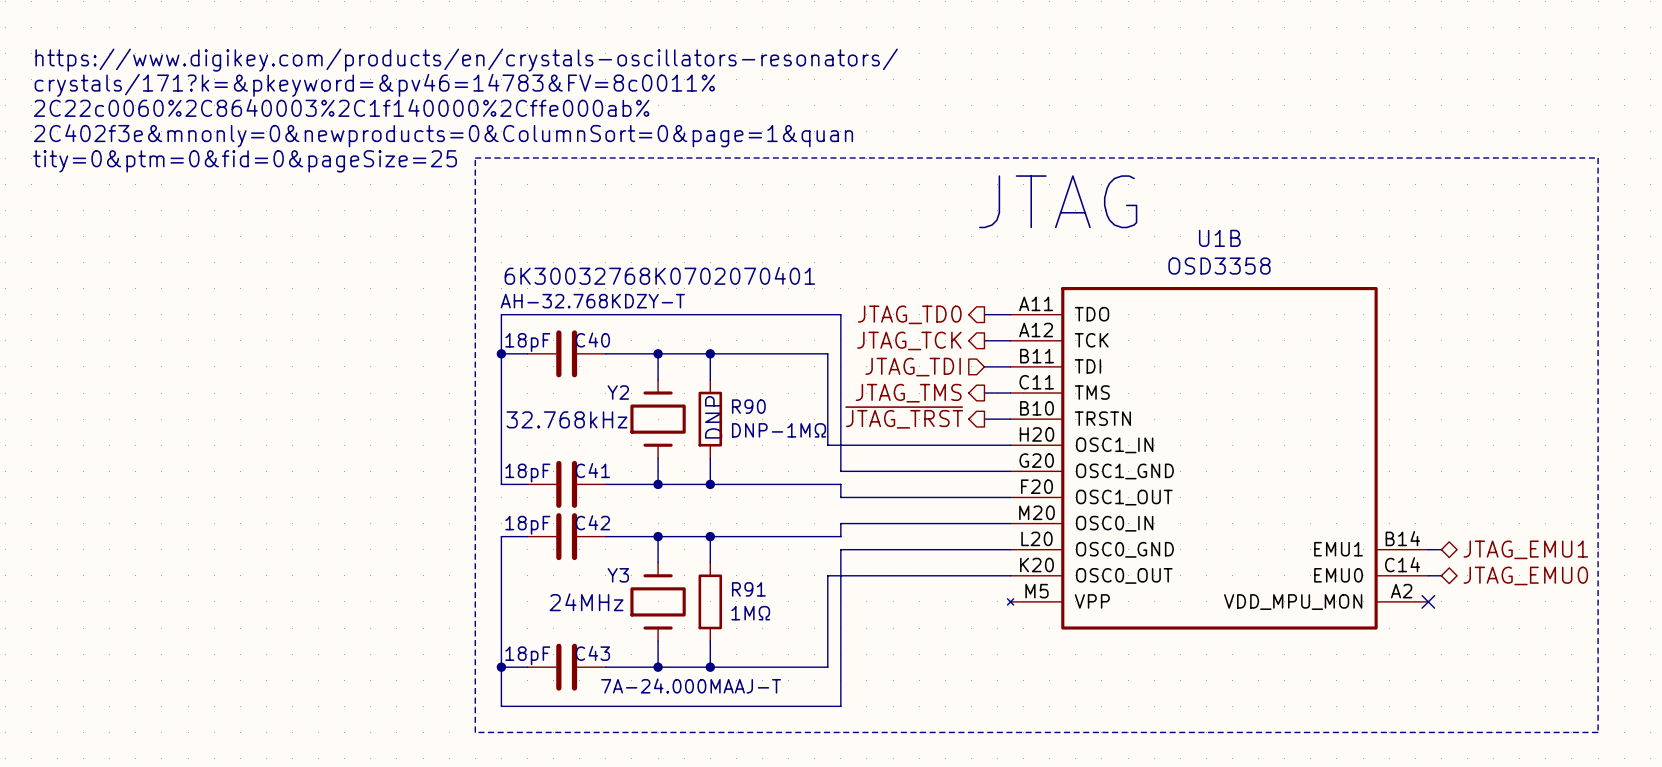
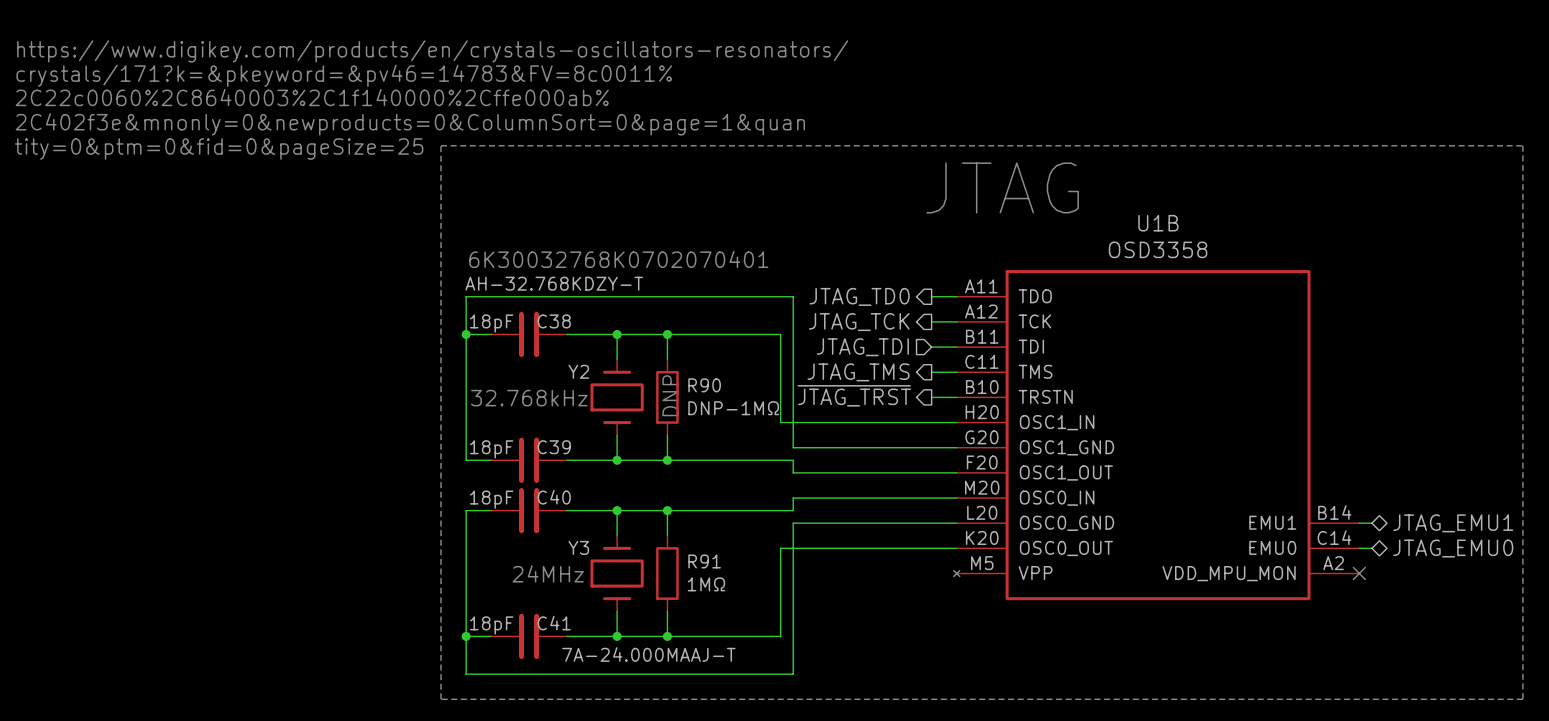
C40 name: C40 (592, 339) -> C38 (554, 321)
C41 name: C41 (592, 470) -> C39 (554, 447)
C42 name: C42 (592, 522) -> C40 (554, 497)
C43 name: C43 (592, 653) -> C41 (554, 623)

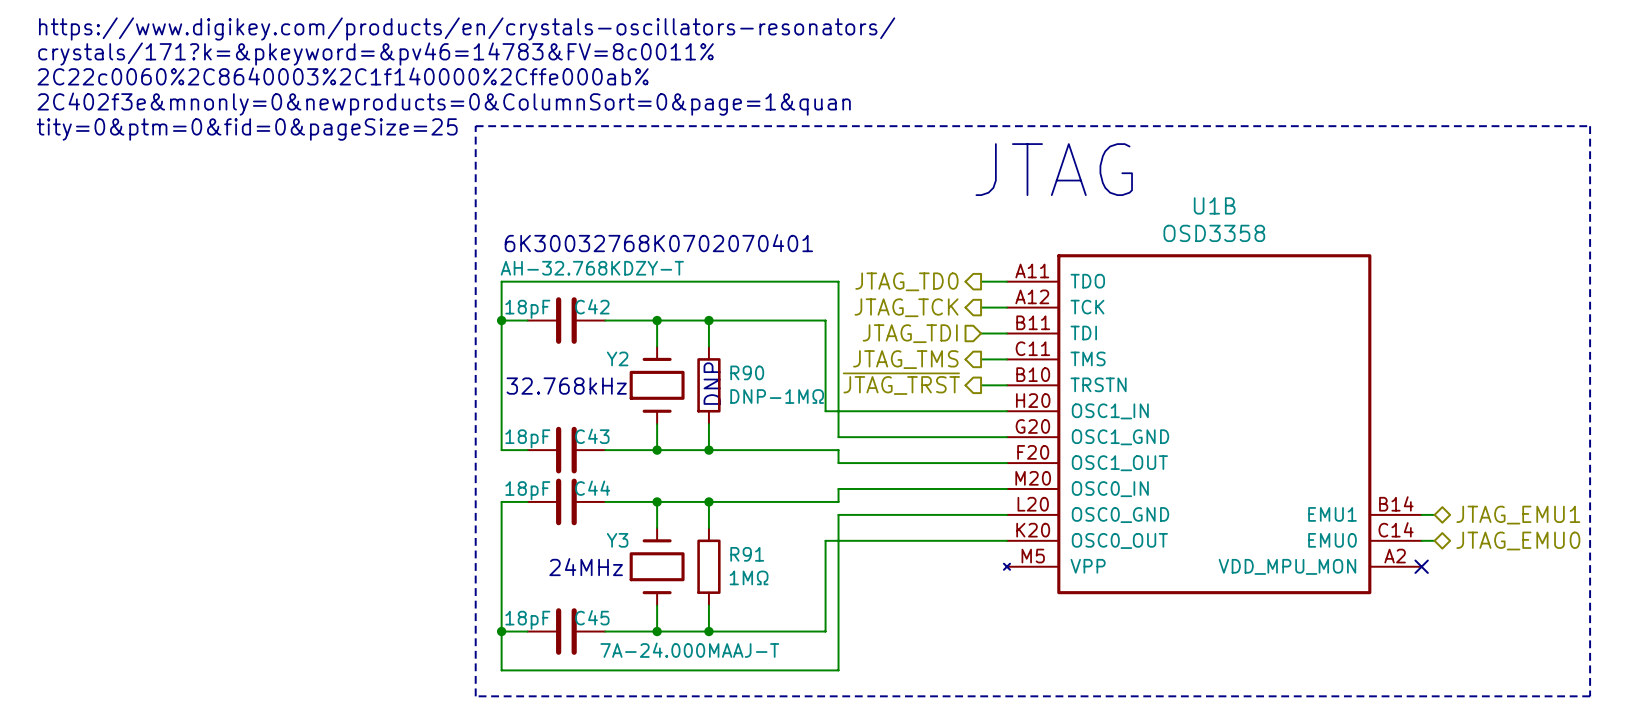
C38 name: C38 (554, 321) -> C42 (592, 306)
C39 name: C39 (554, 447) -> C43 (592, 436)
C40 name: C40 (554, 497) -> C44 (592, 488)
C41 name: C41 (554, 623) -> C45 (592, 617)

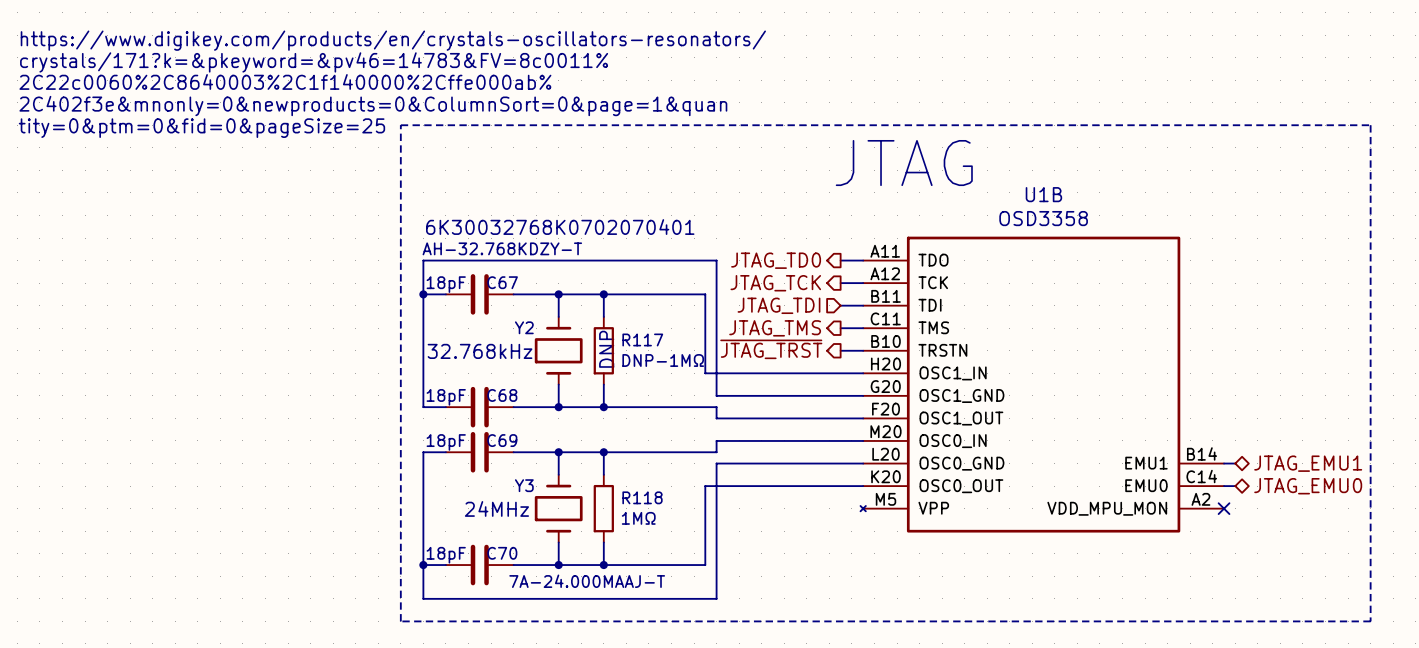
C42 name: C42 (592, 306) -> C67 (502, 282)
R90 name: R90 (747, 372) -> R117 (642, 339)
C43 name: C43 (592, 436) -> C68 (502, 395)
C44 name: C44 (592, 488) -> C69 (502, 440)
R91 name: R91 (747, 554) -> R118 (642, 497)
C45 name: C45 (592, 617) -> C70 (502, 553)

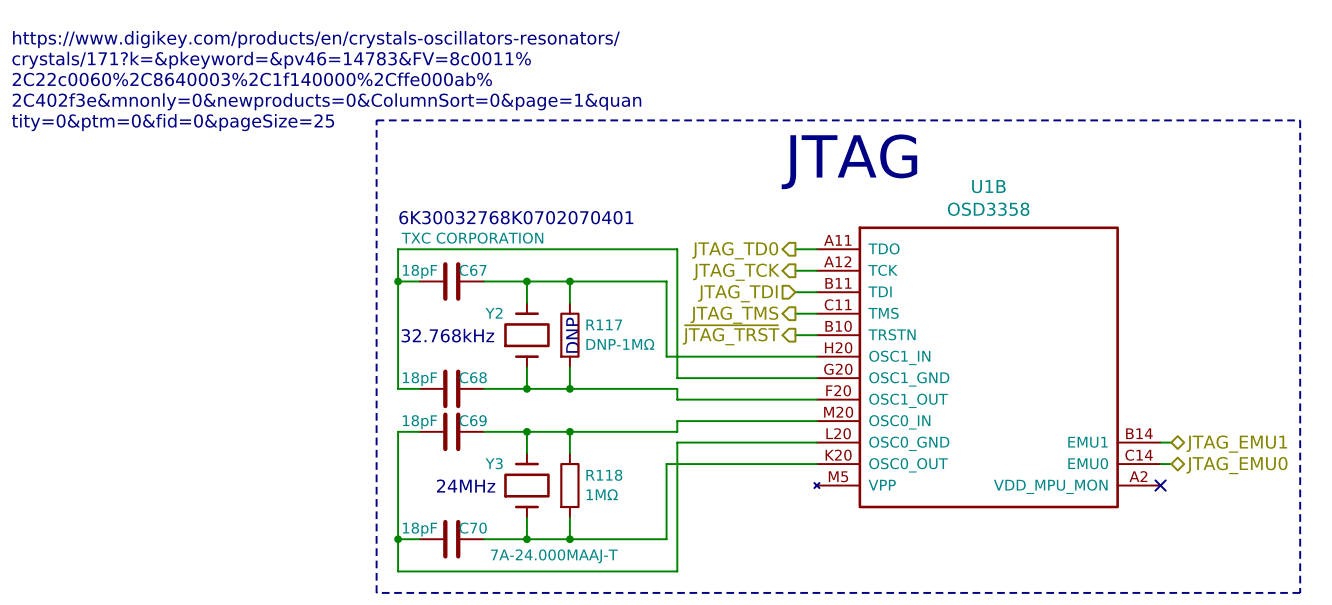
Y2 value: AH-32.768KDZY-T (502, 248) -> TXC CORPORATION (472, 238)

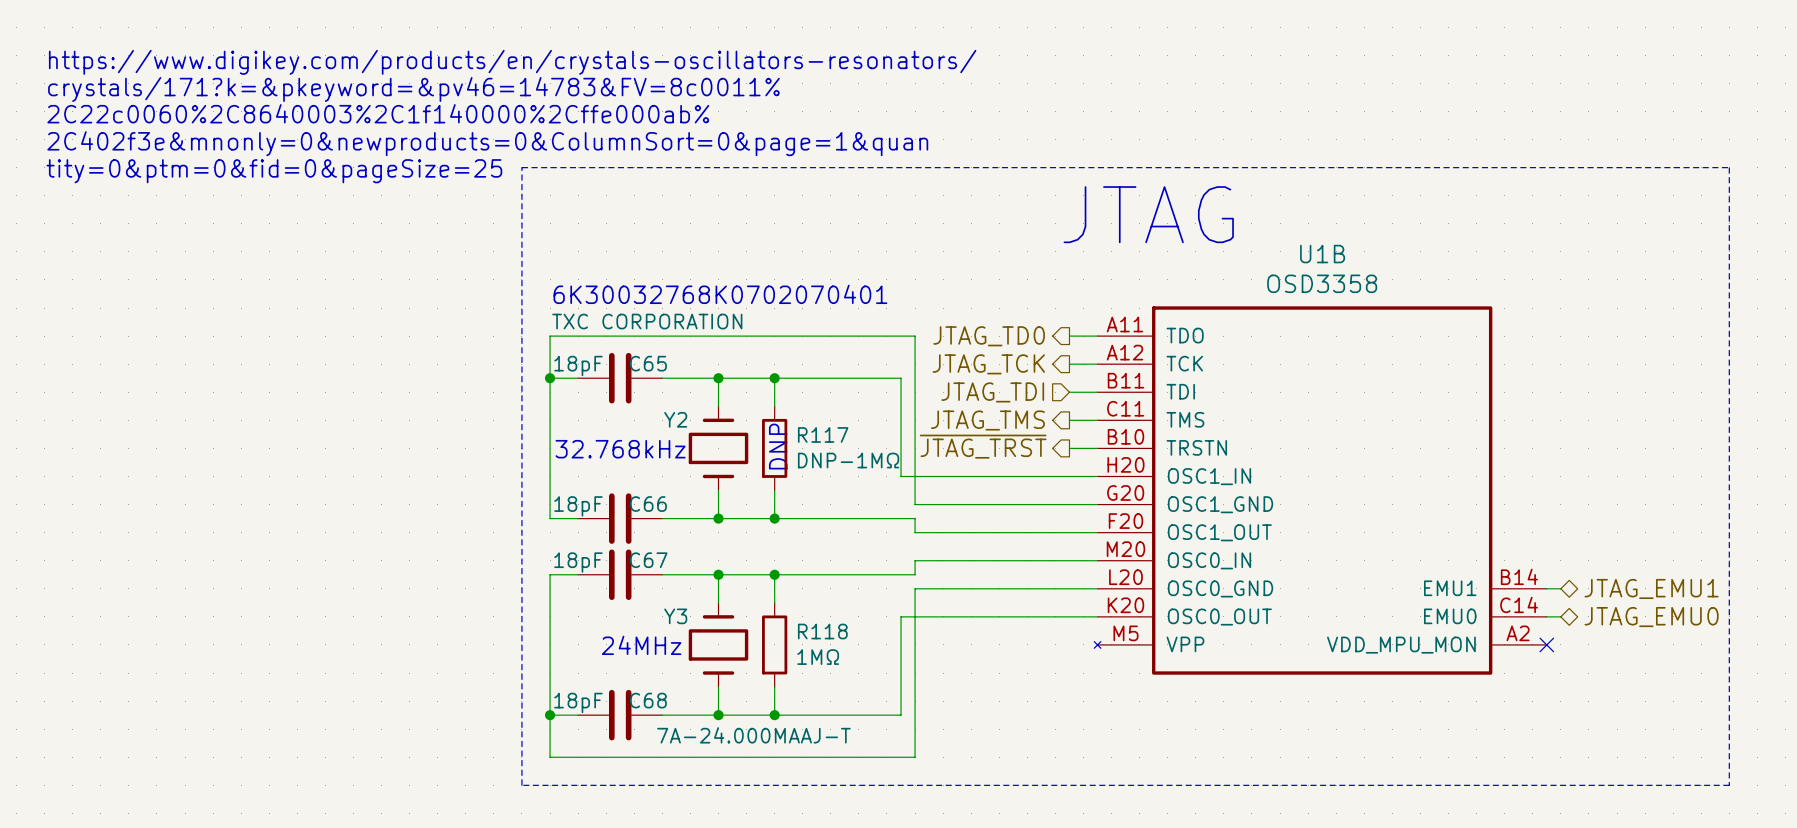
C67 name: C67 (473, 270) -> C65 (648, 363)
C68 name: C68 (473, 377) -> C66 (648, 504)
C69 name: C69 (473, 420) -> C67 (648, 560)
C70 name: C70 (473, 528) -> C68 (648, 700)

